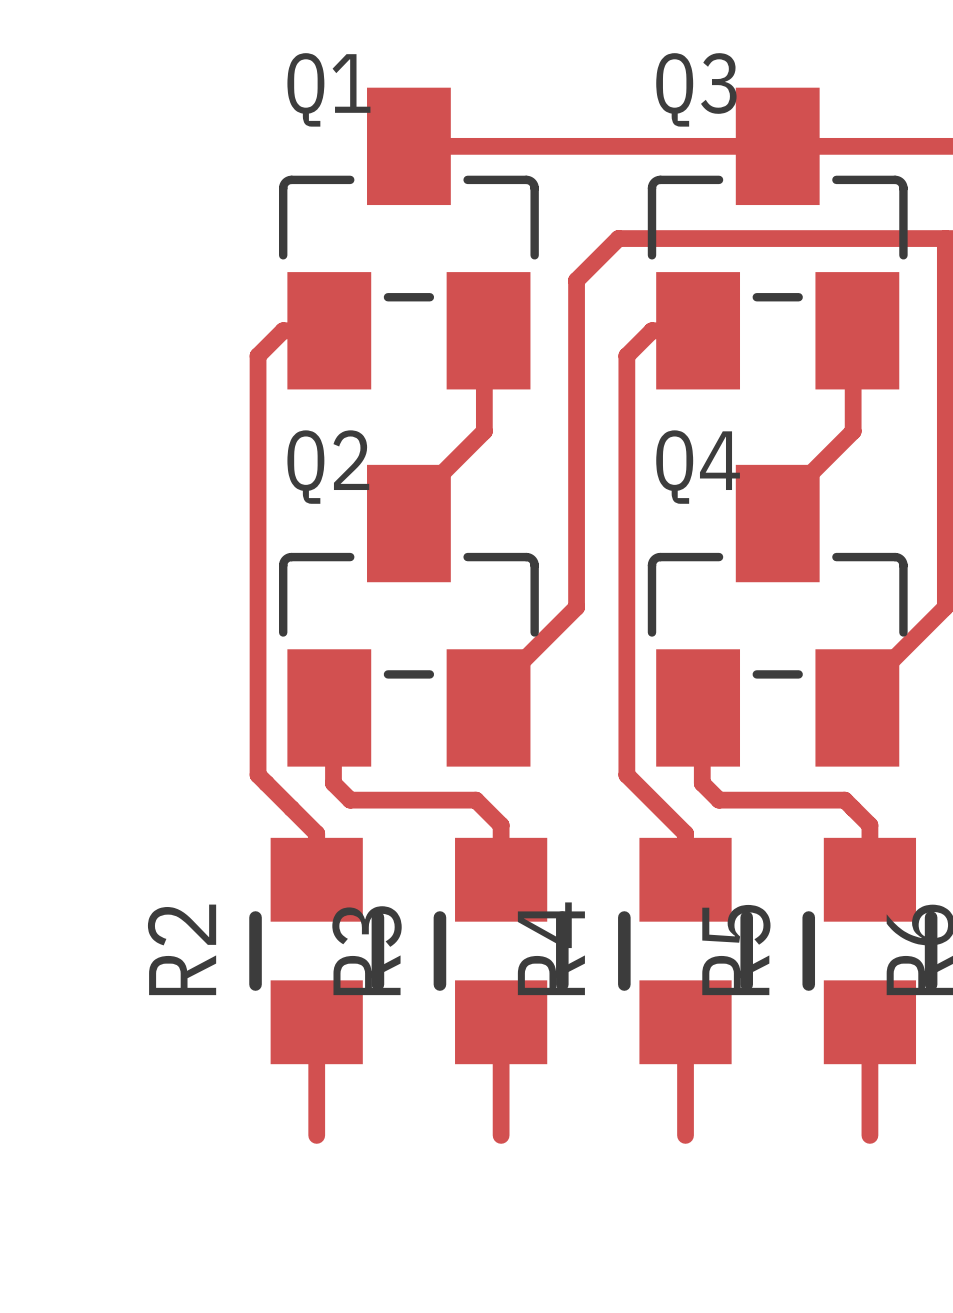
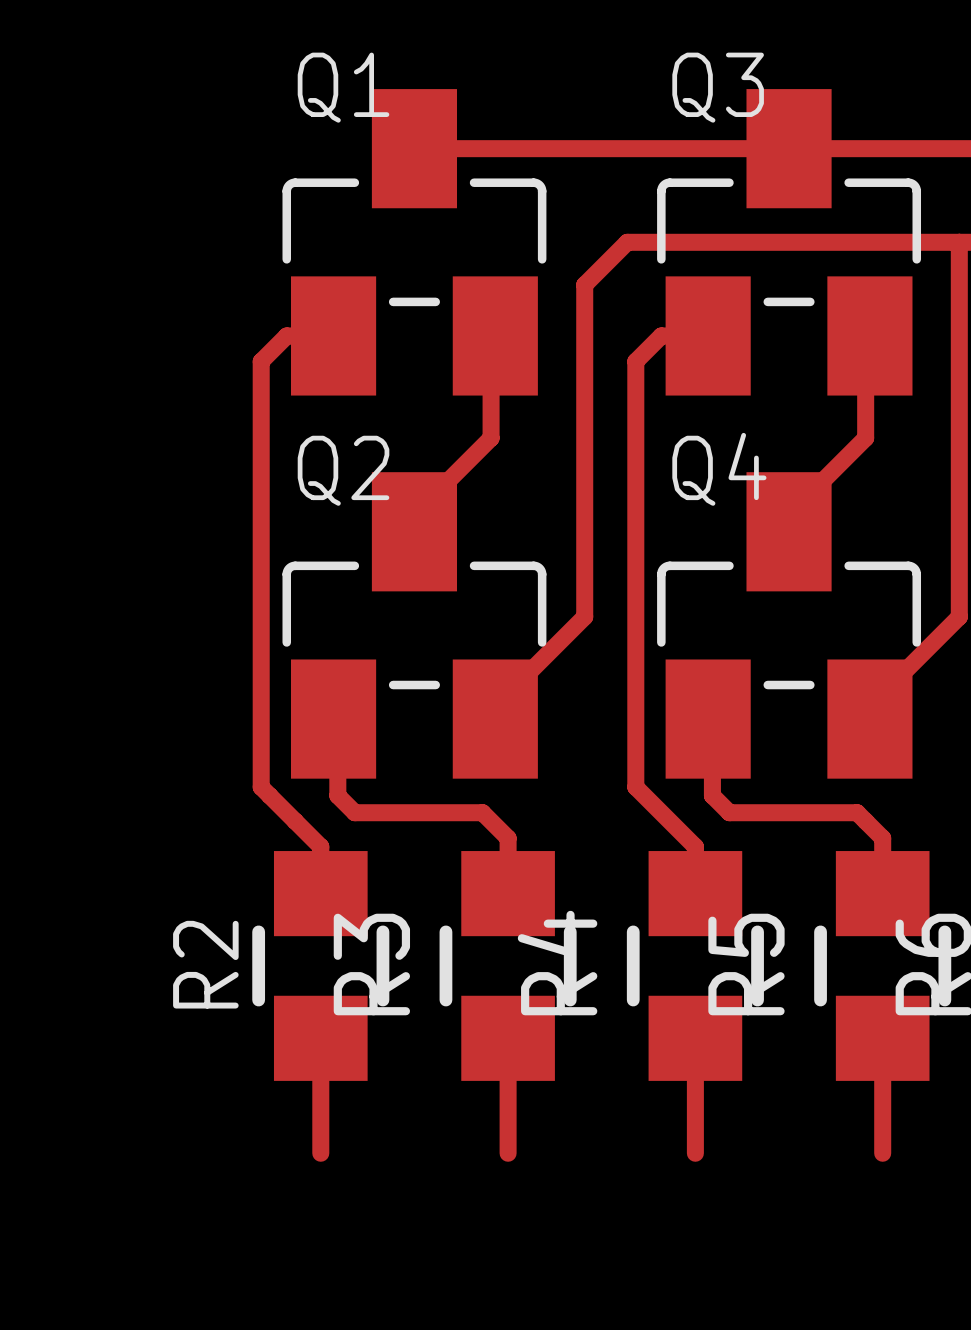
R2 name position: R2 (182, 949) -> R2 (205, 964)

